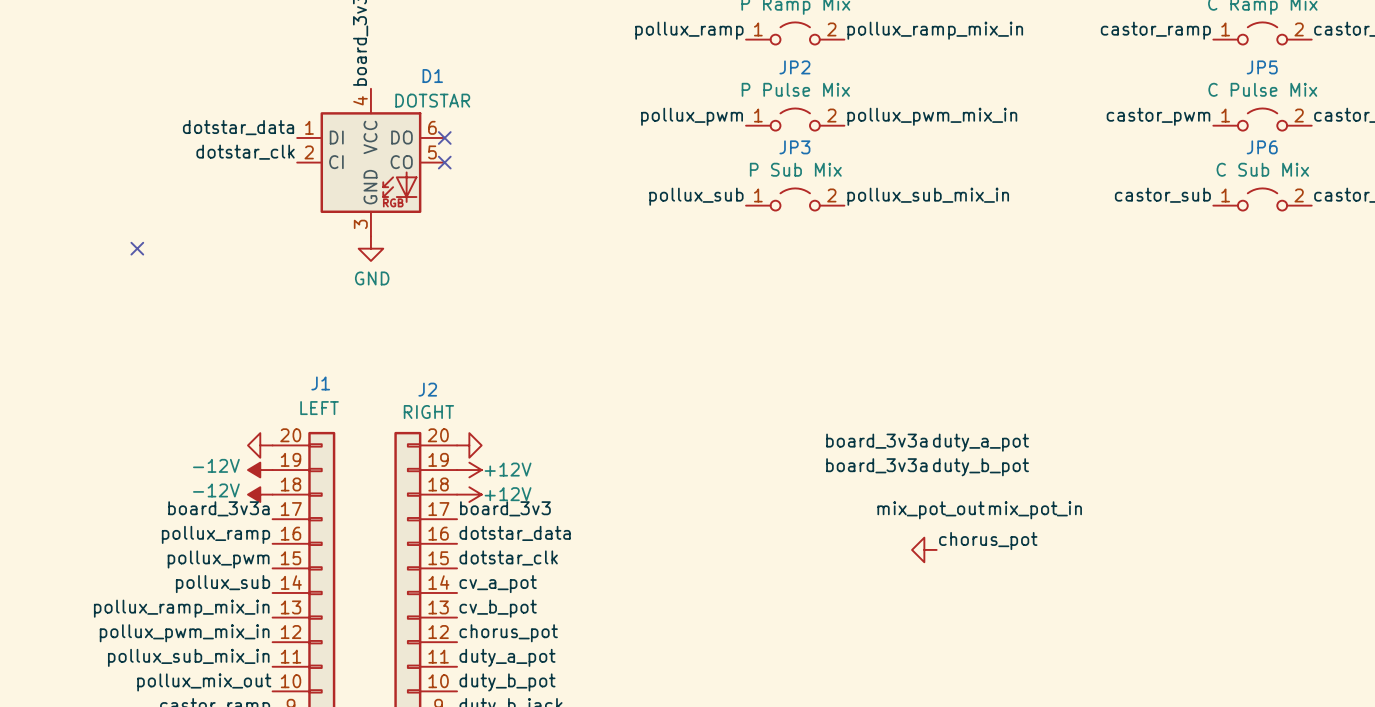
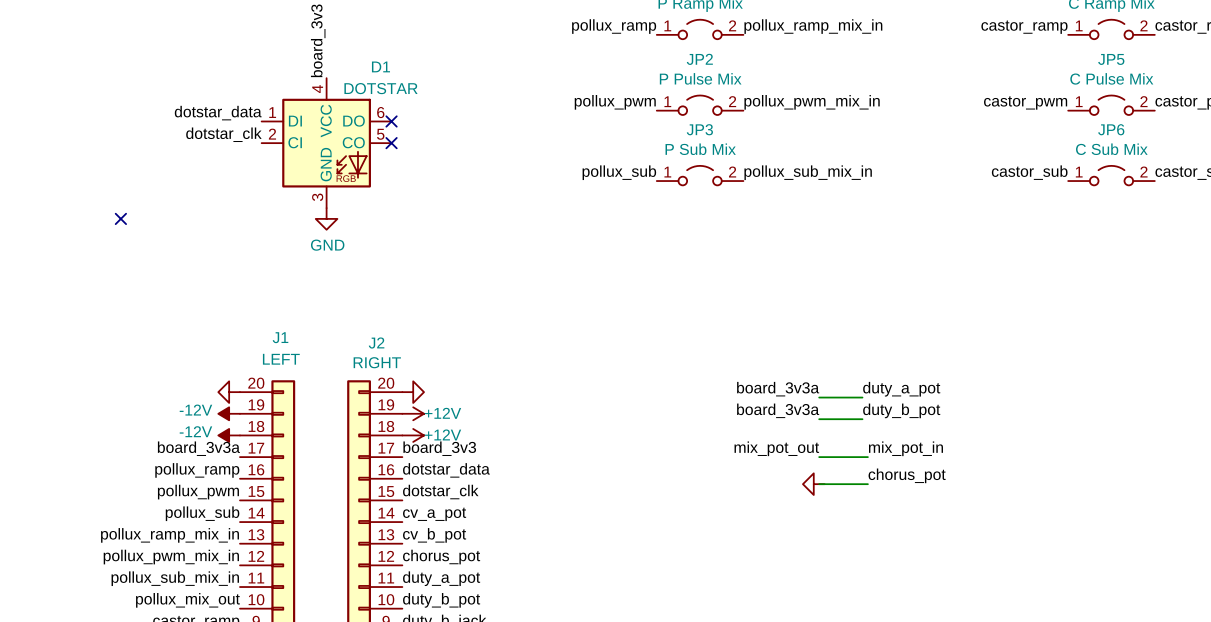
label position: duty_a_pot (980, 442) -> duty_a_pot (901, 389)
wire: none -> (819, 397) (862, 397)
label position: duty_b_pot (980, 467) -> duty_b_pot (901, 410)
wire: none -> (819, 419) (862, 419)
label position: mix_pot_out (930, 510) -> mix_pot_out (776, 448)
wire: none -> (819, 457) (867, 457)
label position: chorus_pot (988, 541) -> chorus_pot (907, 475)
wire: none -> (819, 484) (867, 484)

